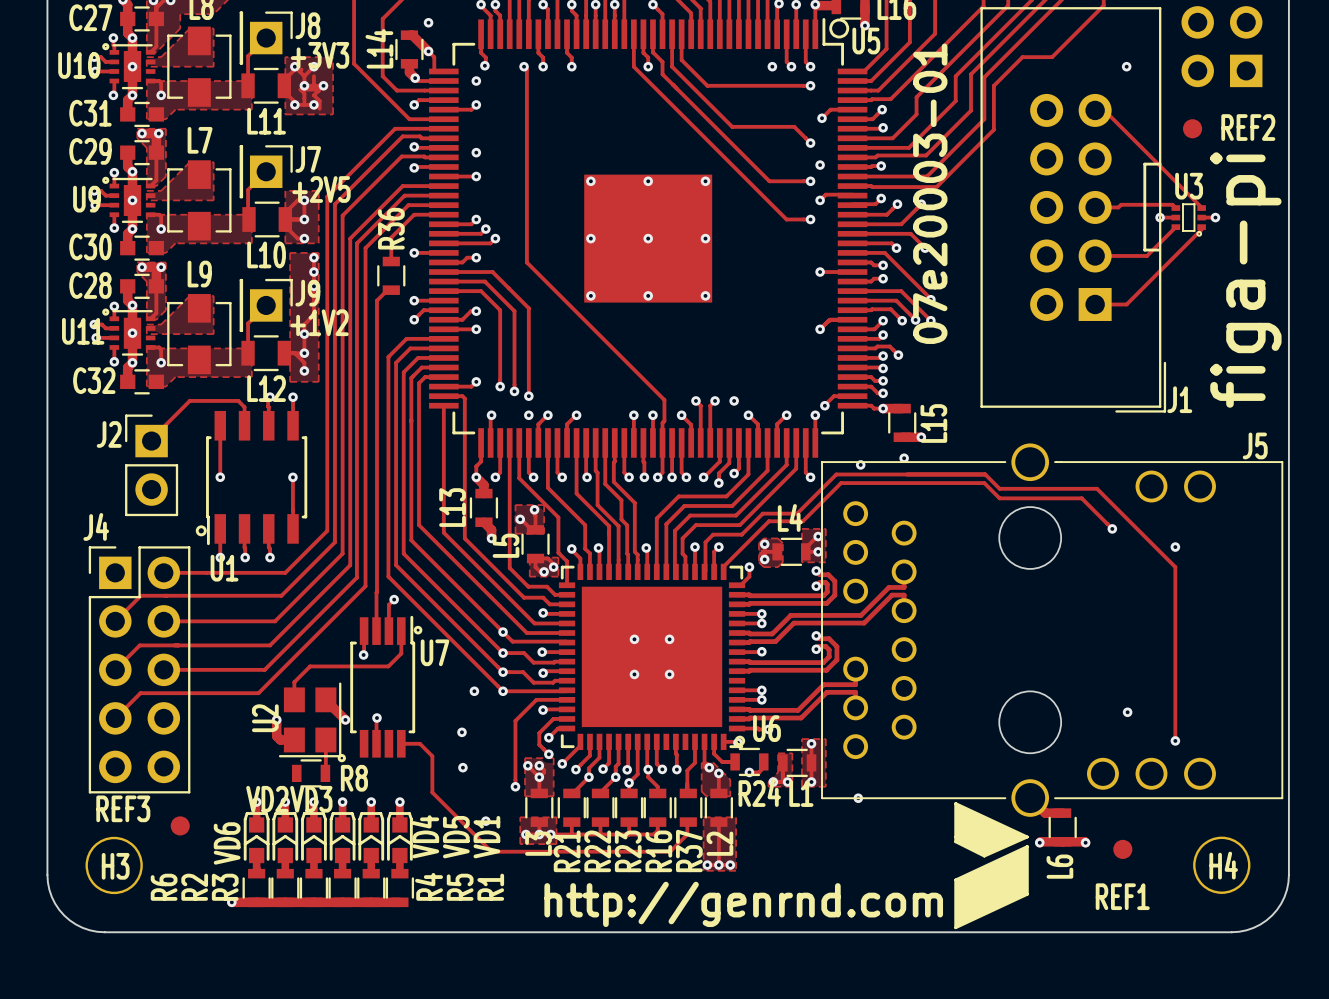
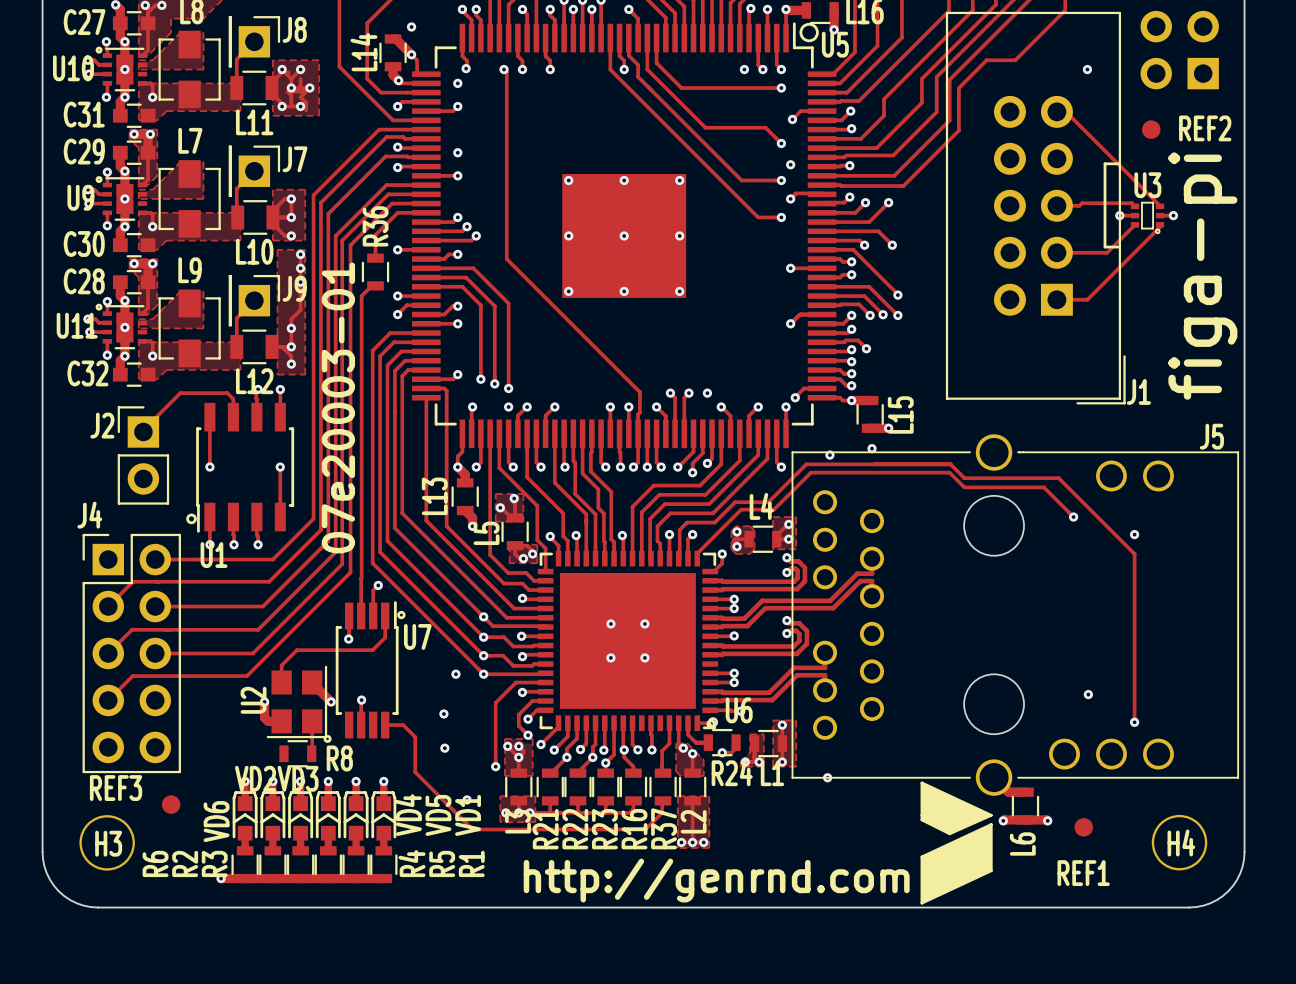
text: +3V3 (320, 55) -> none
text: +2V5 (321, 189) -> none
text: 07e20003-01 (930, 193) -> none
text: +1V2 (319, 322) -> none
text: none -> 07e20003-01 (338, 407)

